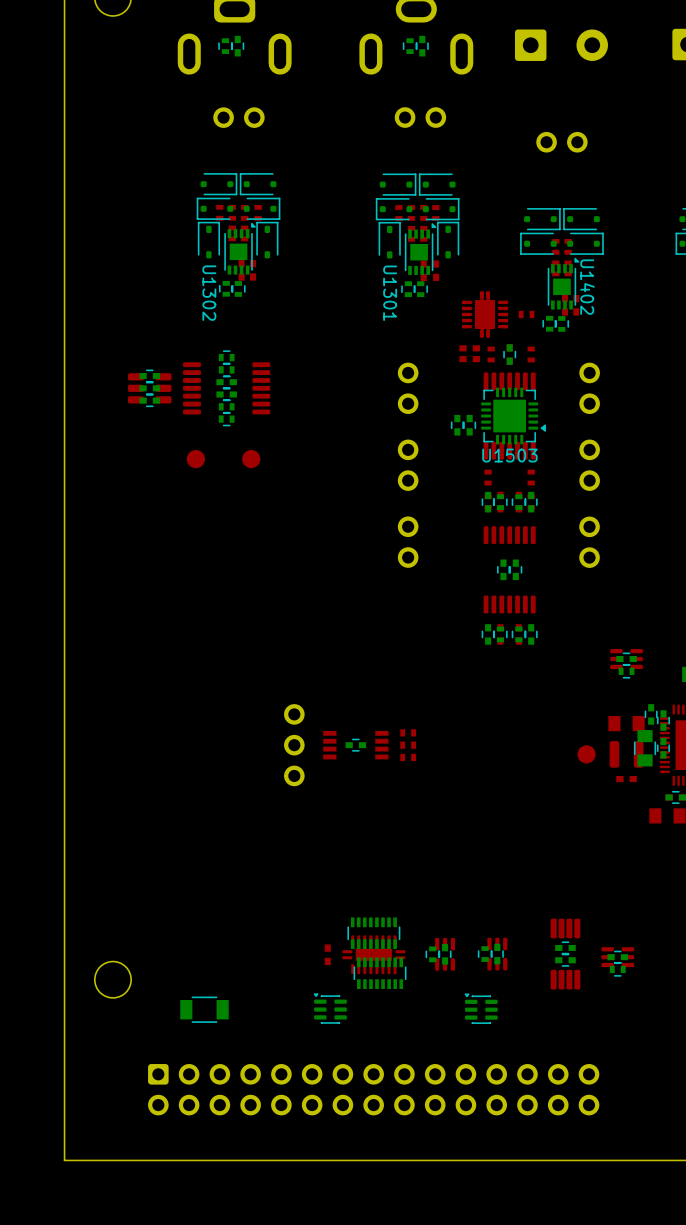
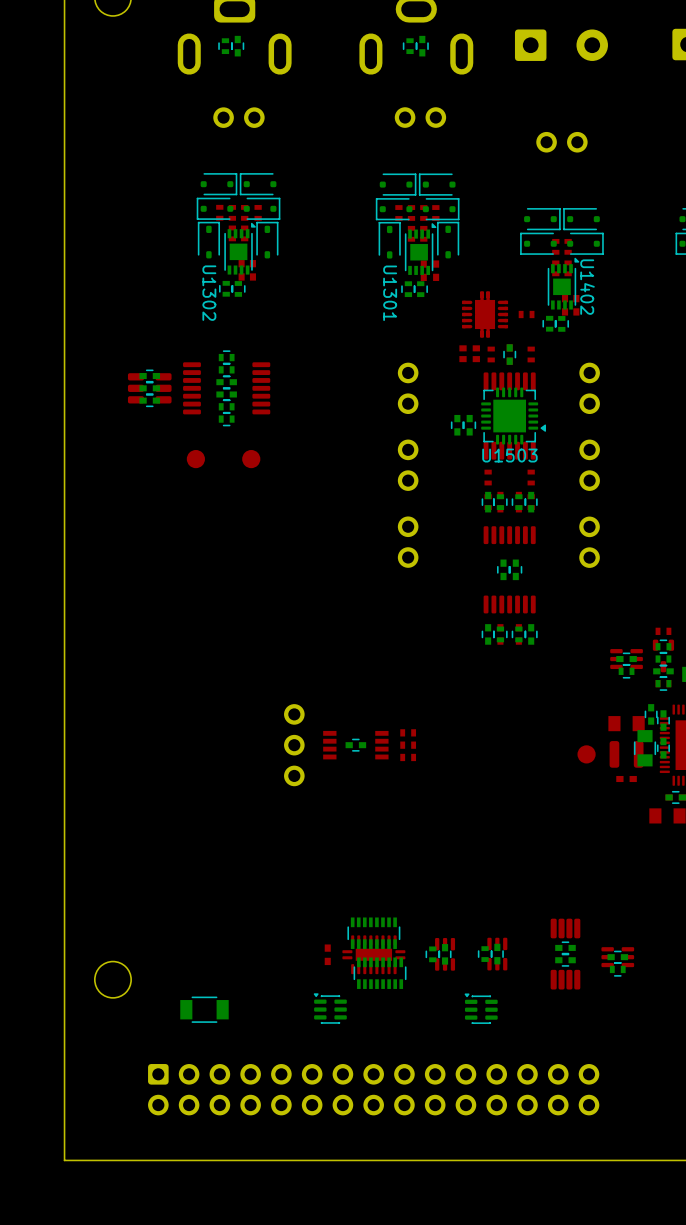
part: none -> (663, 631)
part: none -> (663, 646)
part: none -> (663, 655)
part: none -> (663, 659)
part: none -> (663, 671)
part: none -> (663, 683)

